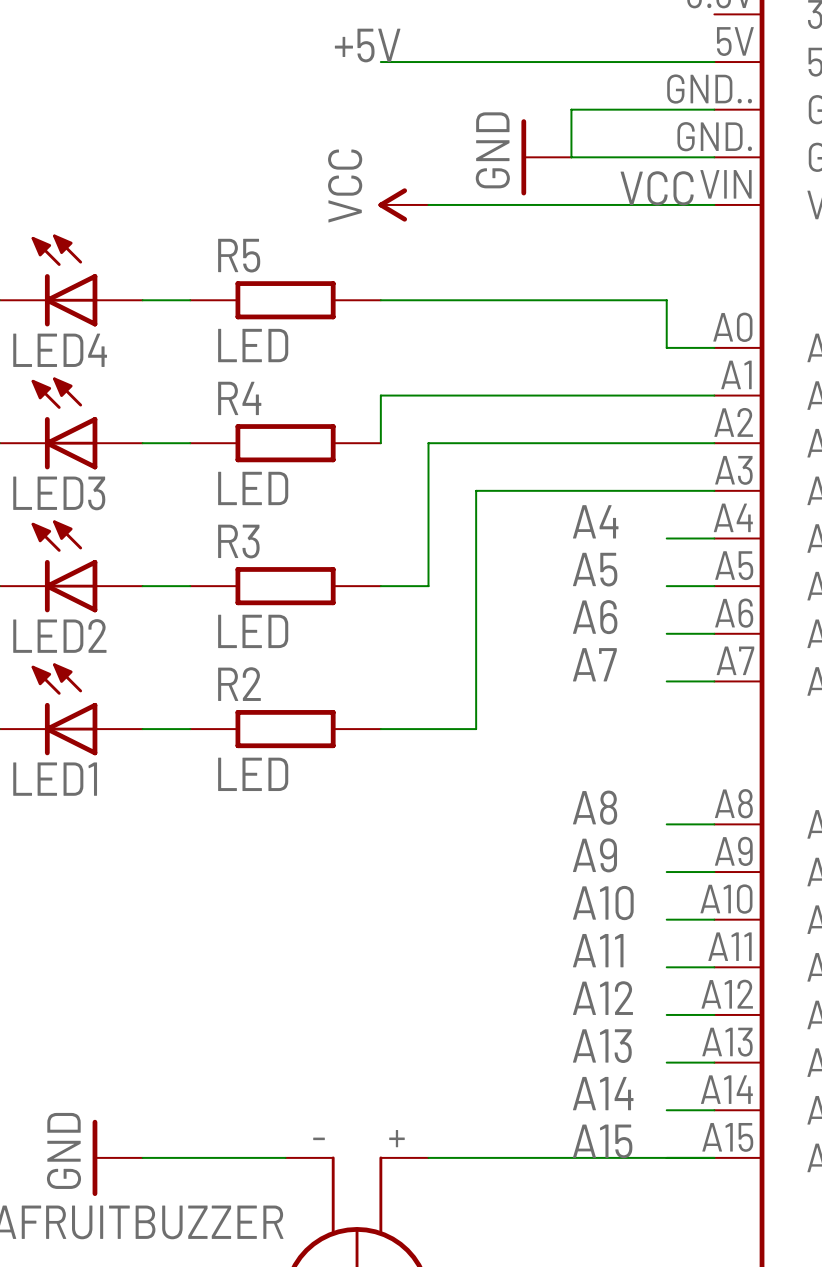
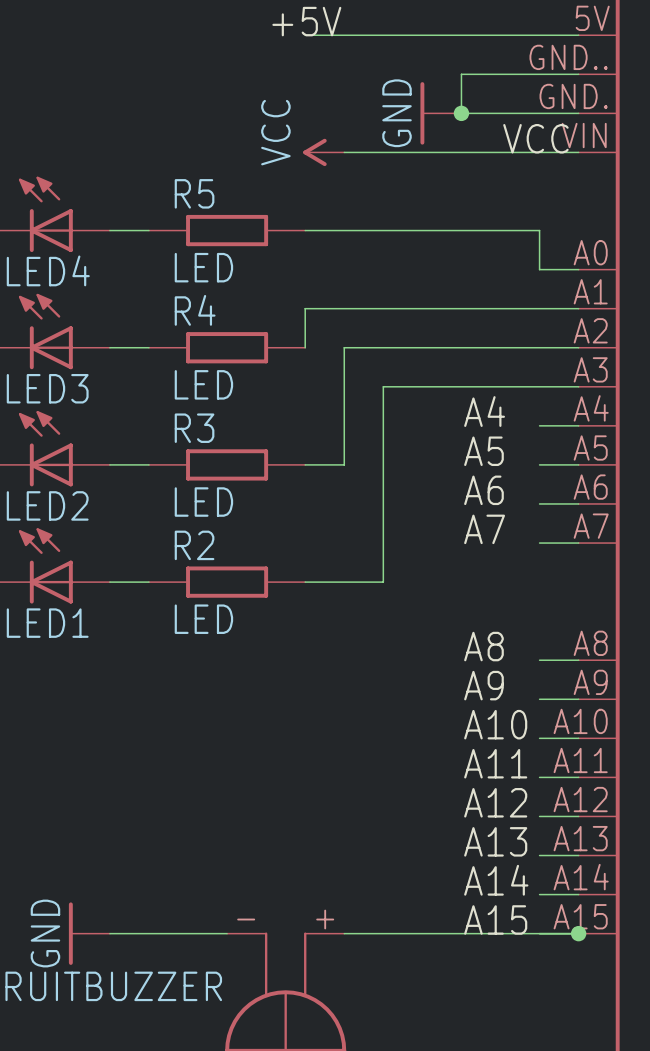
junction: none -> (461, 113)
junction: none -> (578, 933)

